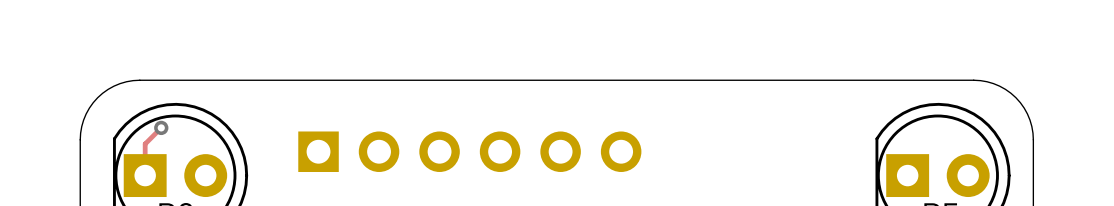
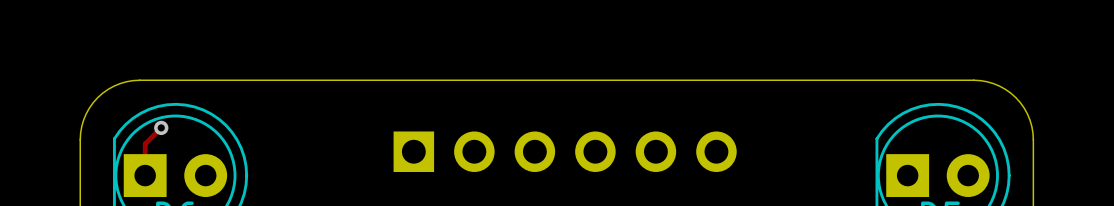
part position: (469, 151) -> (565, 151)

